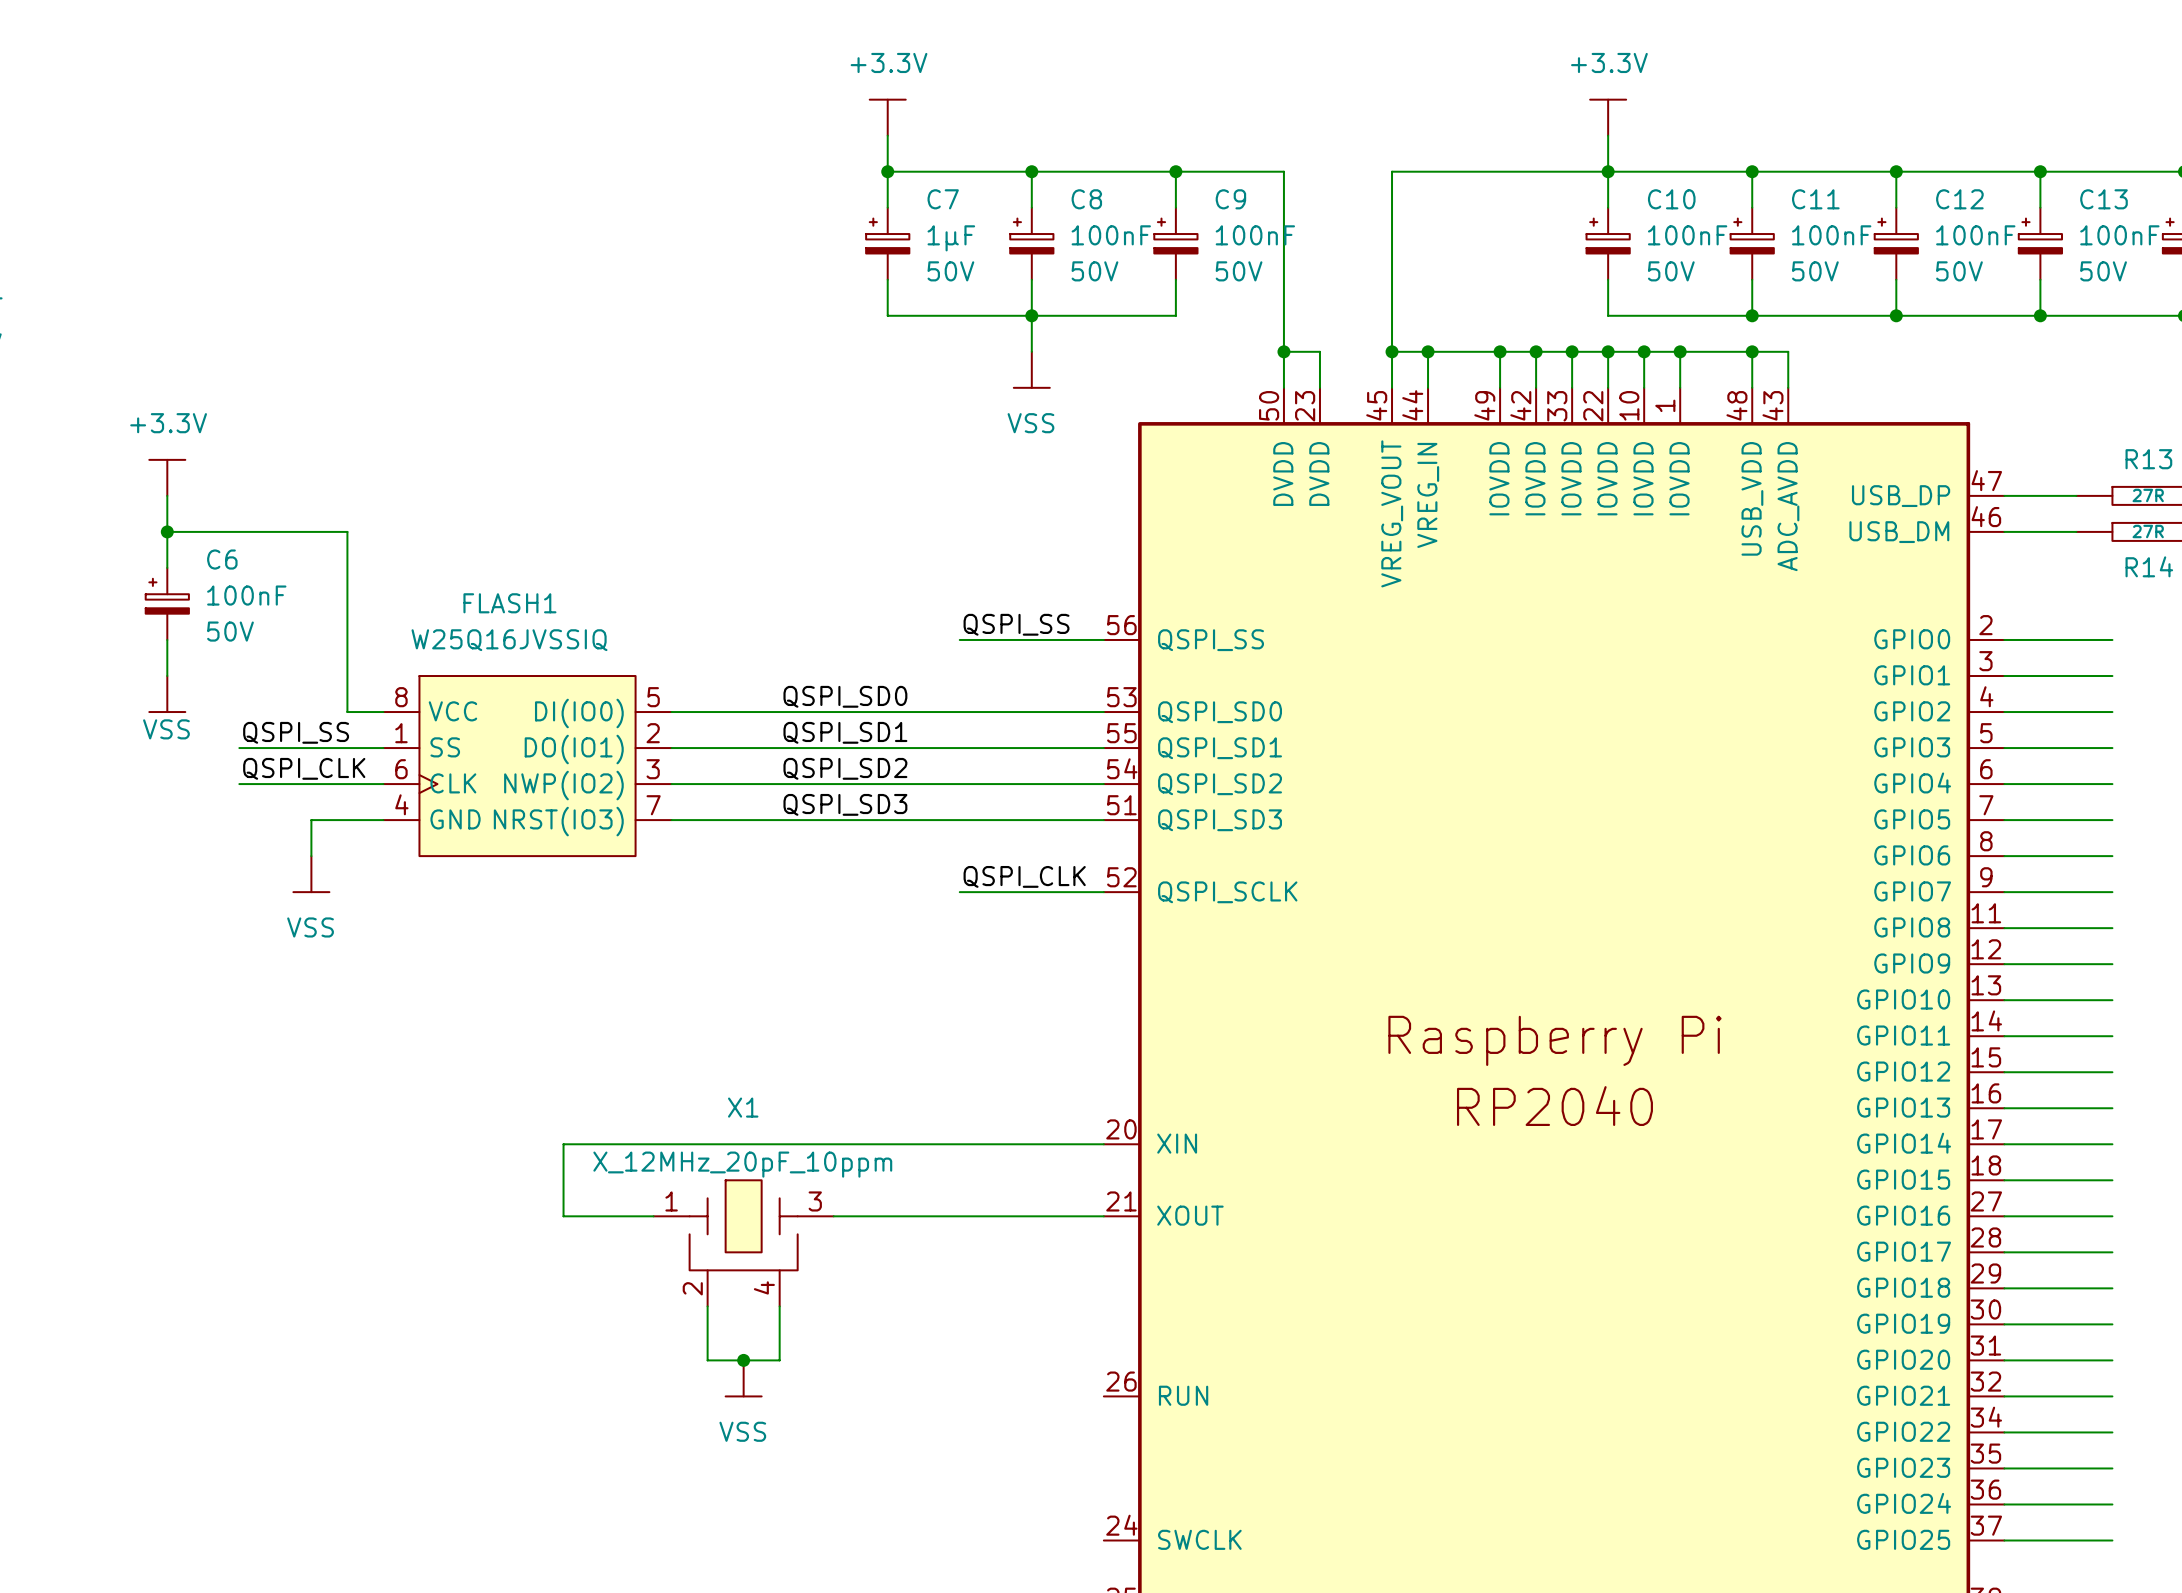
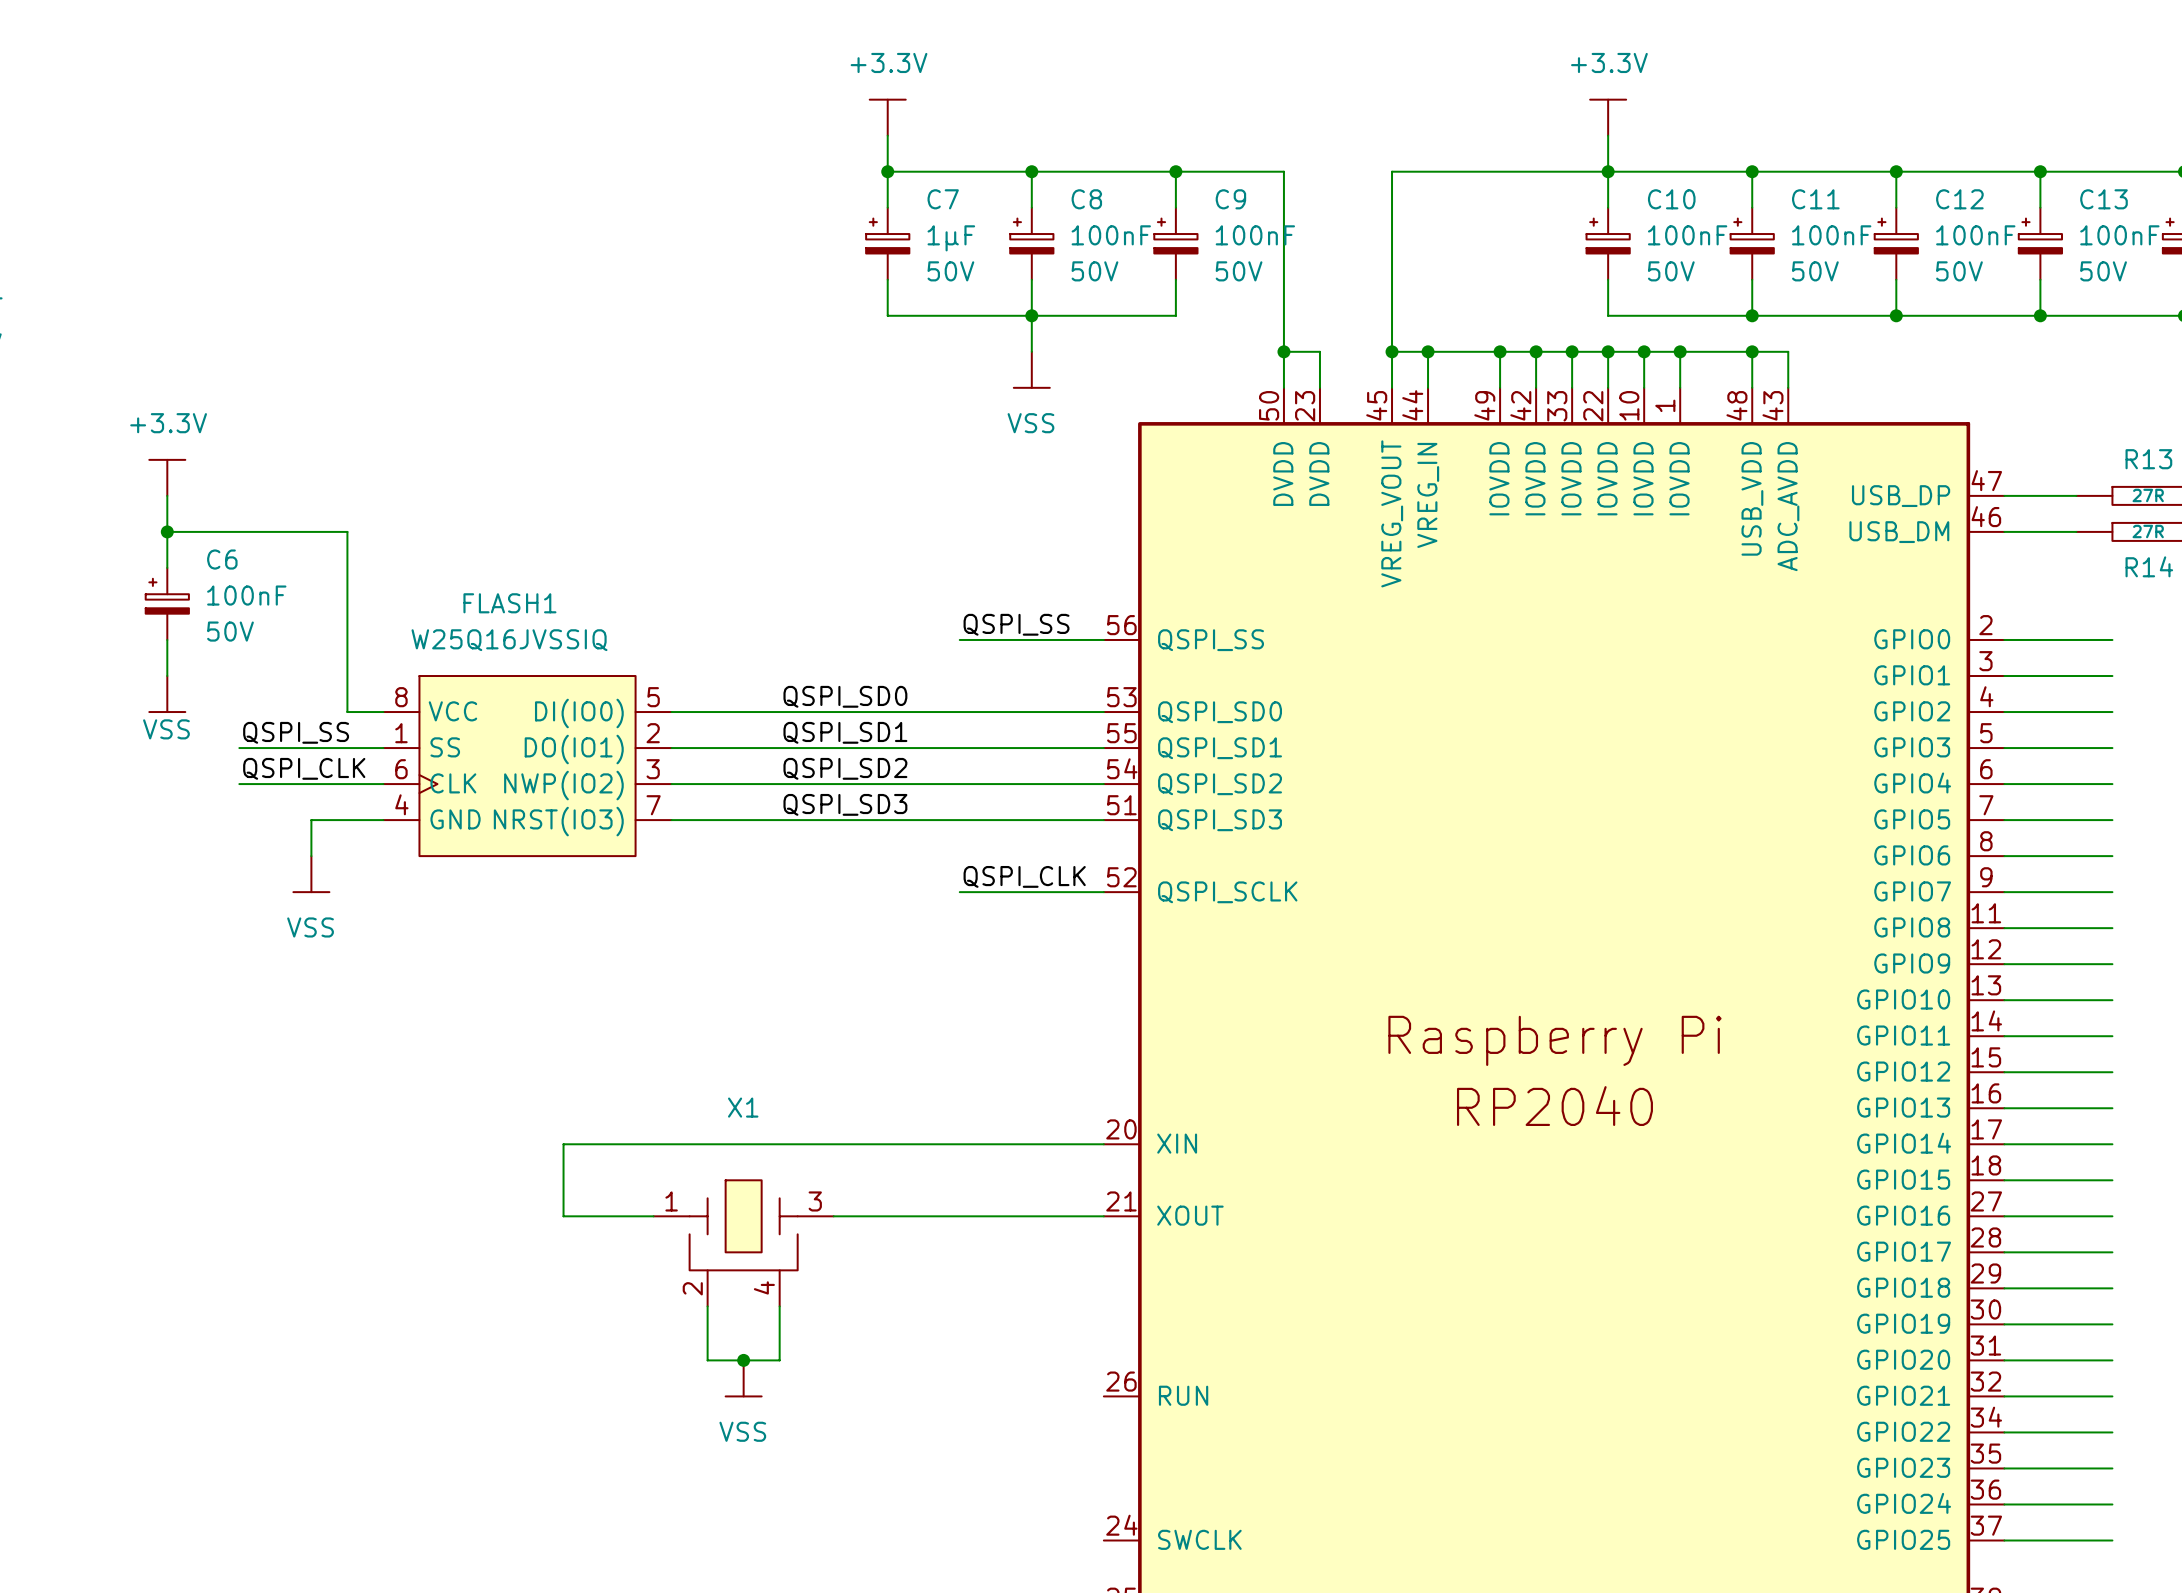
X1 value: X_12MHz_20pF_10ppm (742, 1164) -> none

